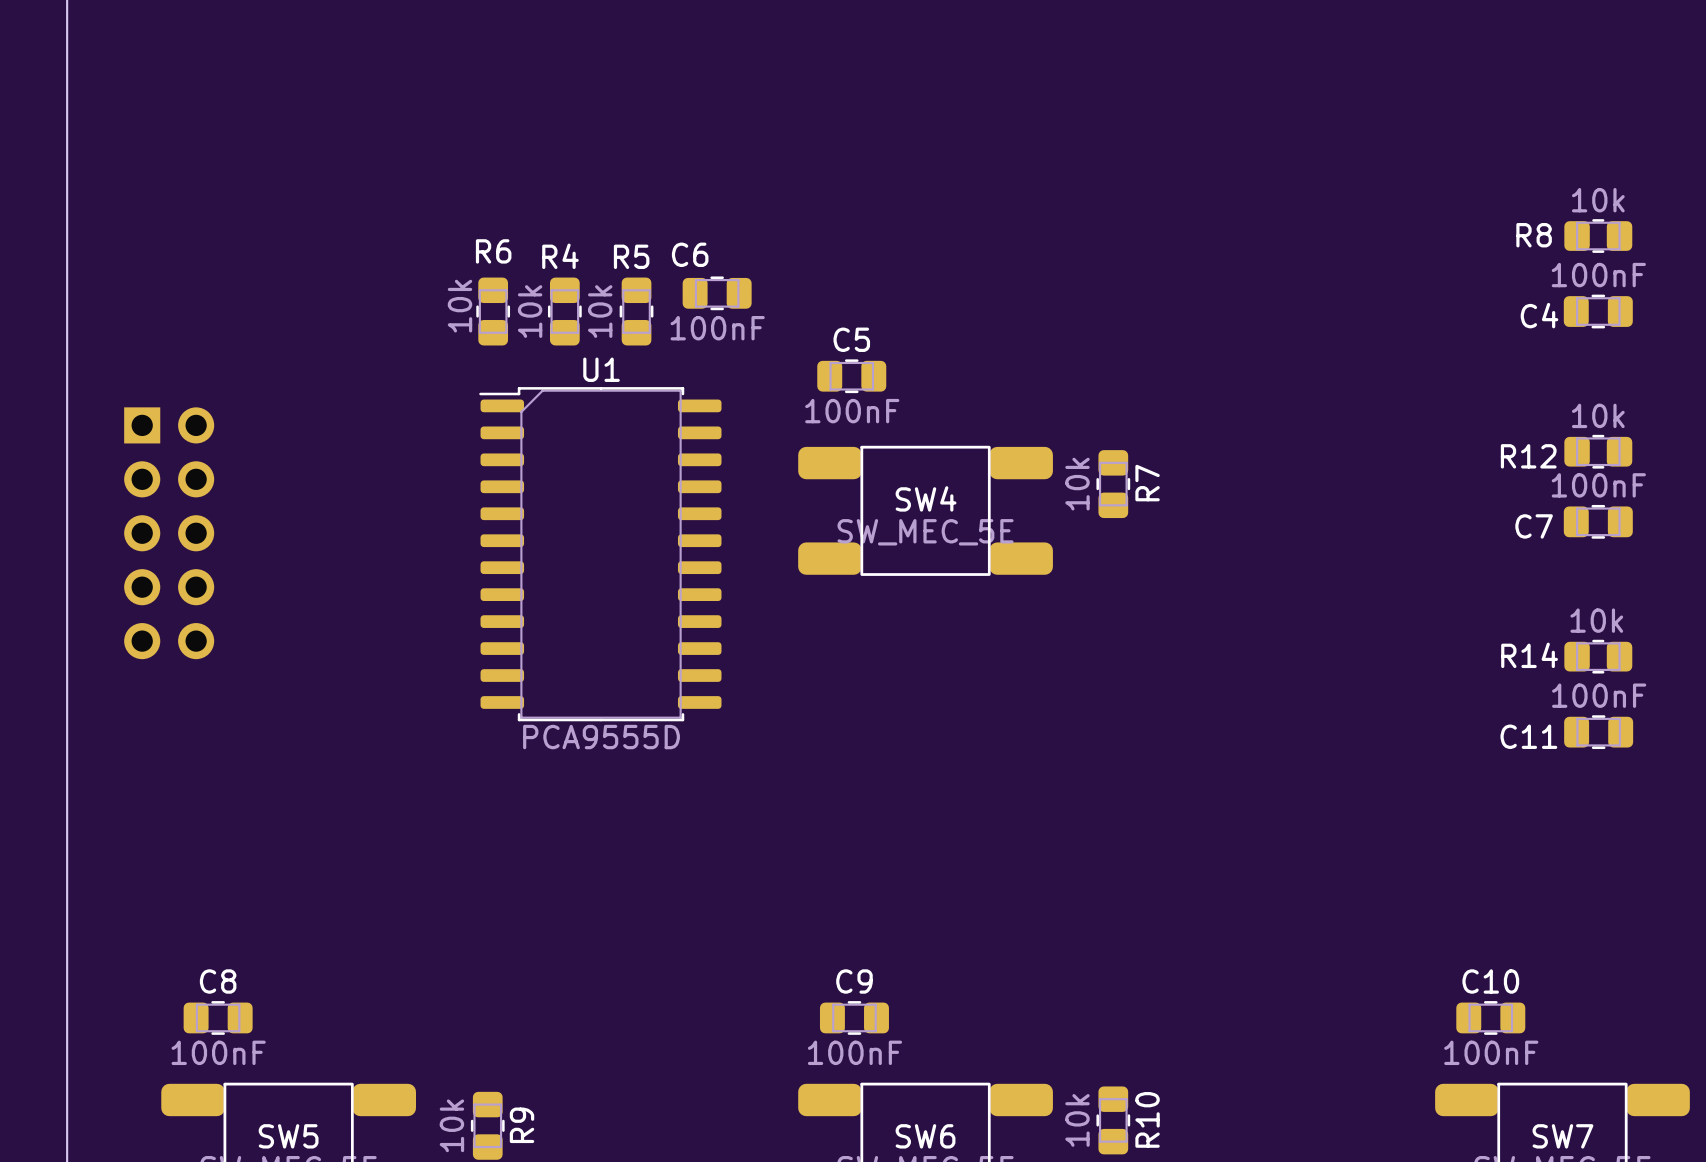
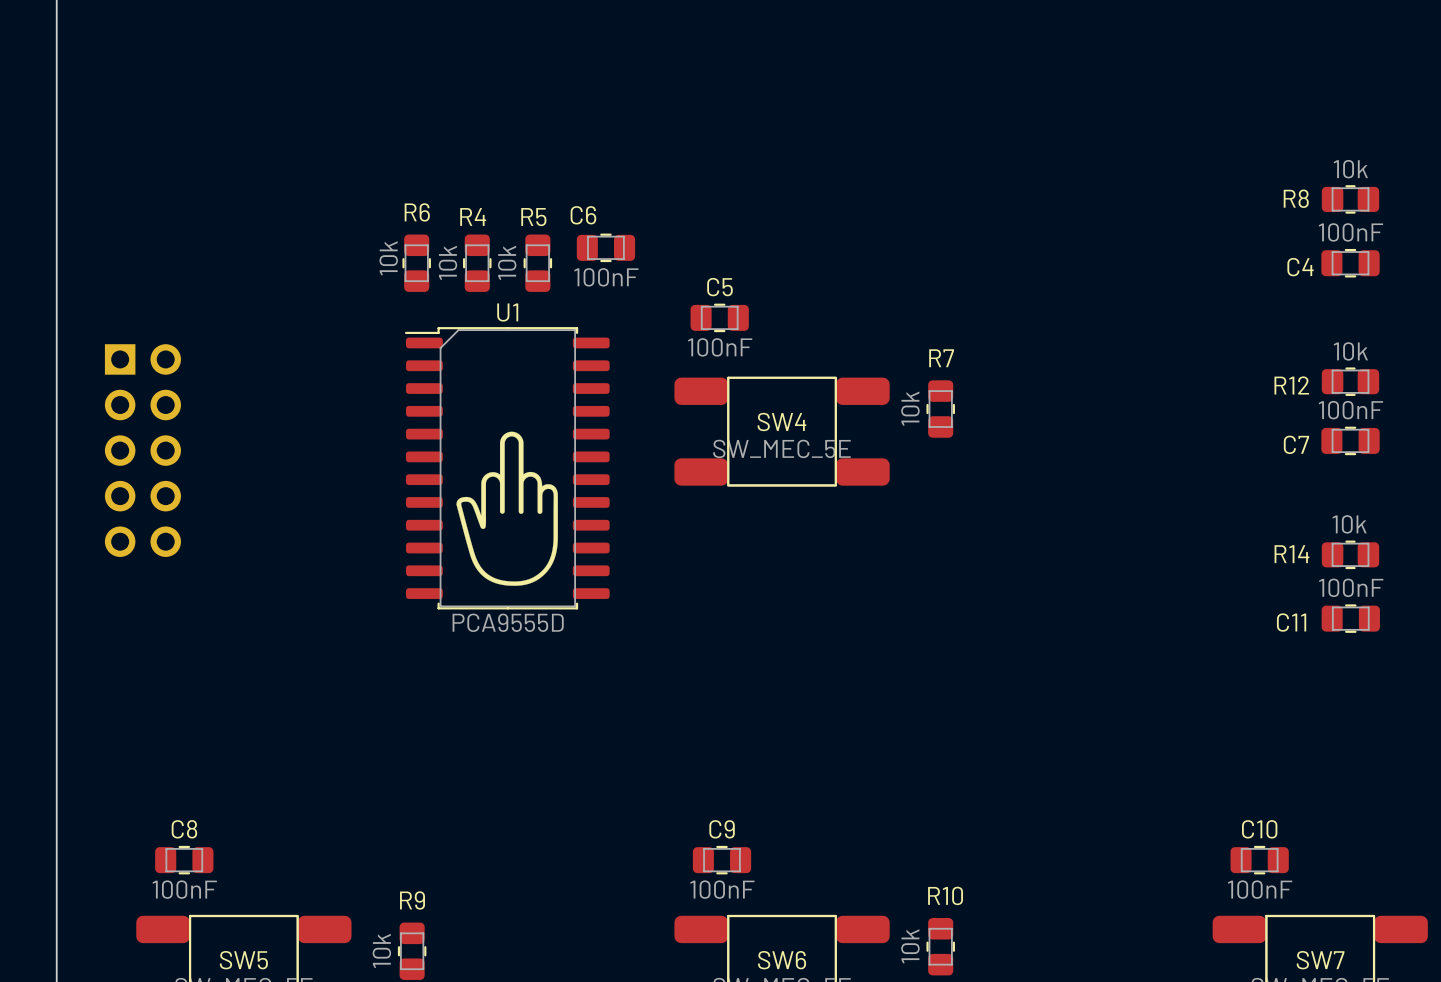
R7 name rotation: 0° (1147, 483) -> 90° clockwise (941, 358)
R7 name position: R7 (1147, 483) -> R7 (941, 358)
drawing: none -> [456, 431, 558, 586]
R10 name rotation: 0° (1147, 1119) -> 90° clockwise (945, 895)
R9 name rotation: 0° (522, 1125) -> 90° clockwise (412, 900)
R9 name position: R9 (522, 1125) -> R9 (412, 900)

